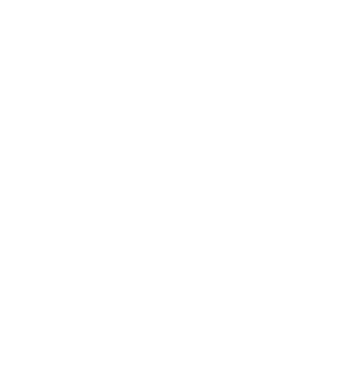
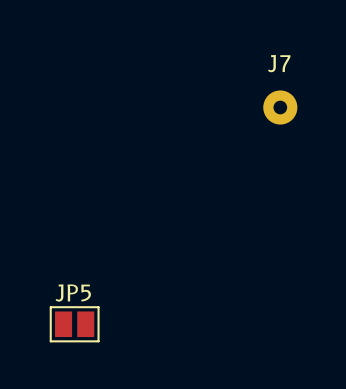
J7: none -> (280, 107)
JP5: none -> (74, 324)

